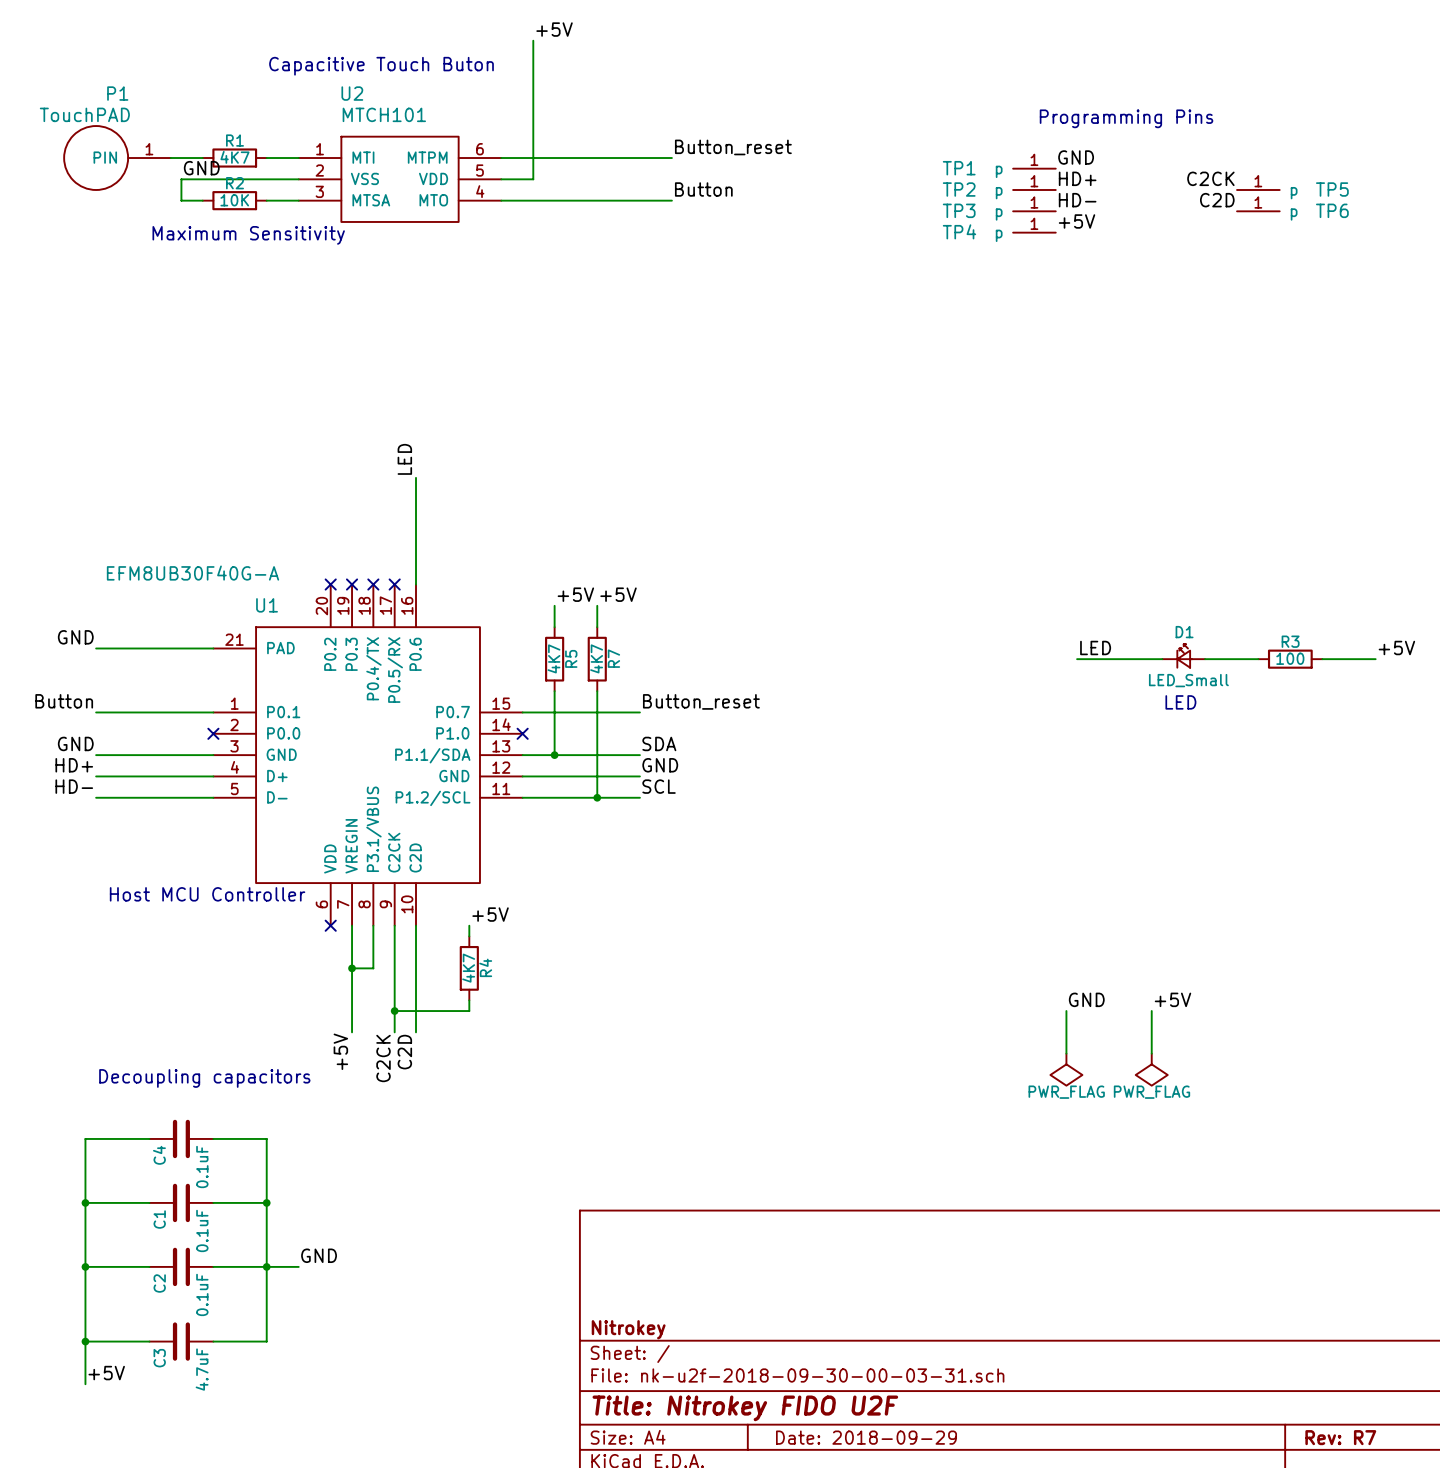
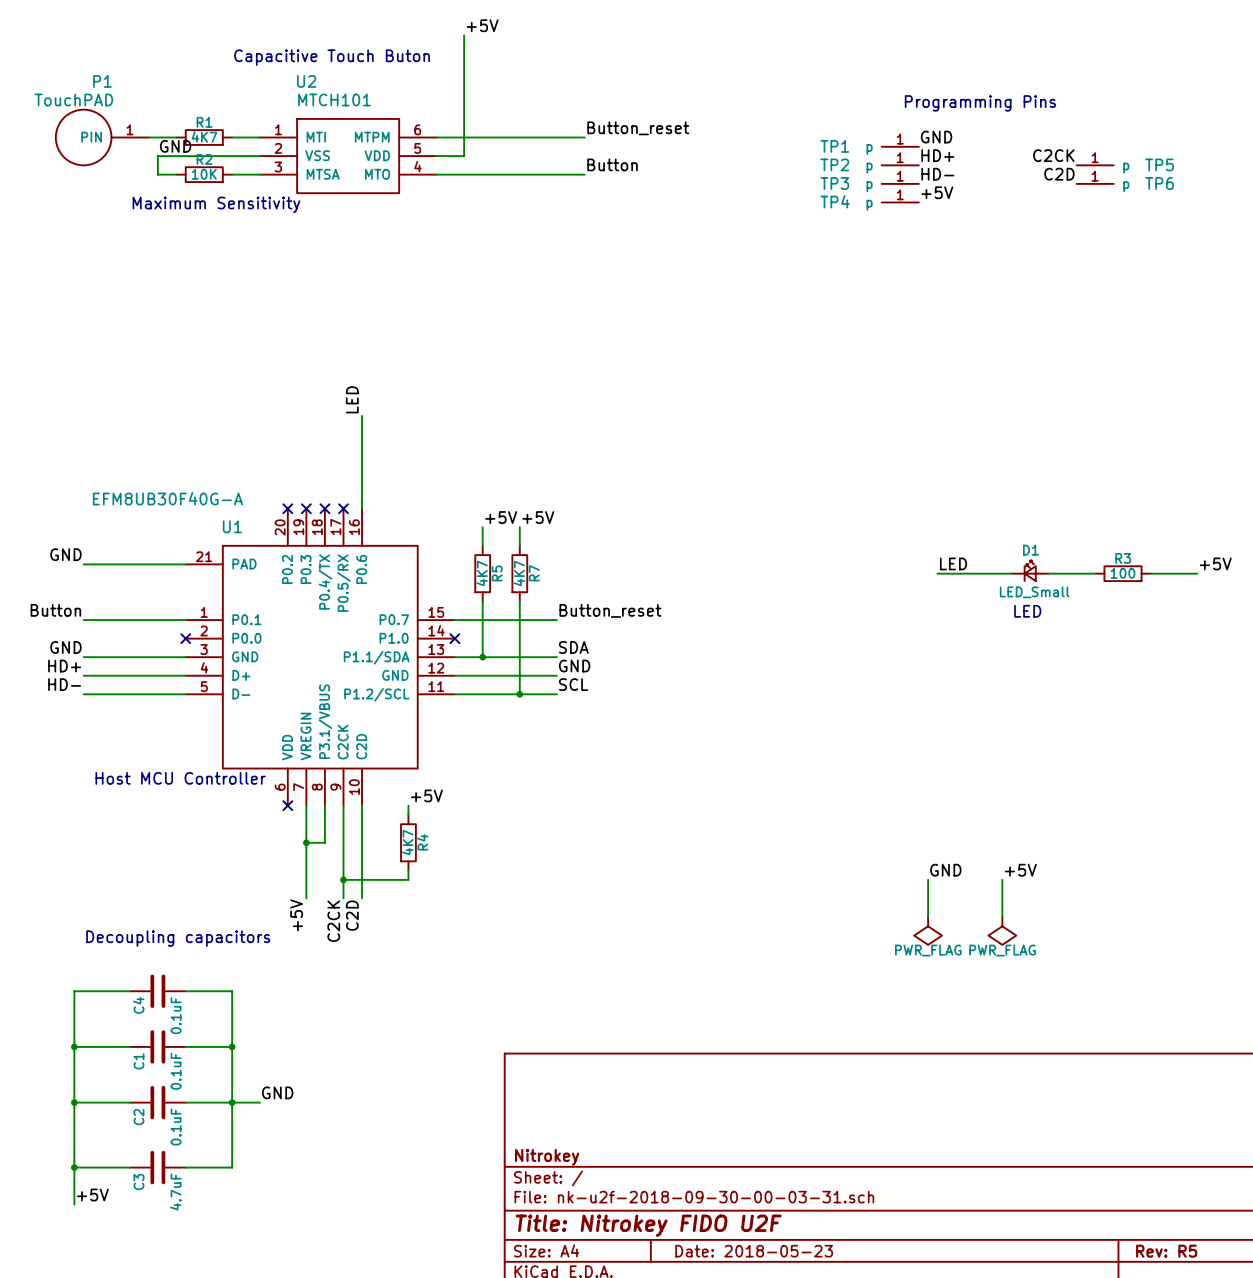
title block: Date: 2018-09-29 (866, 1437) -> Date: 2018-05-23 (754, 1251)
title block: Rev: R7 (1340, 1437) -> Rev: R5 (1166, 1251)

